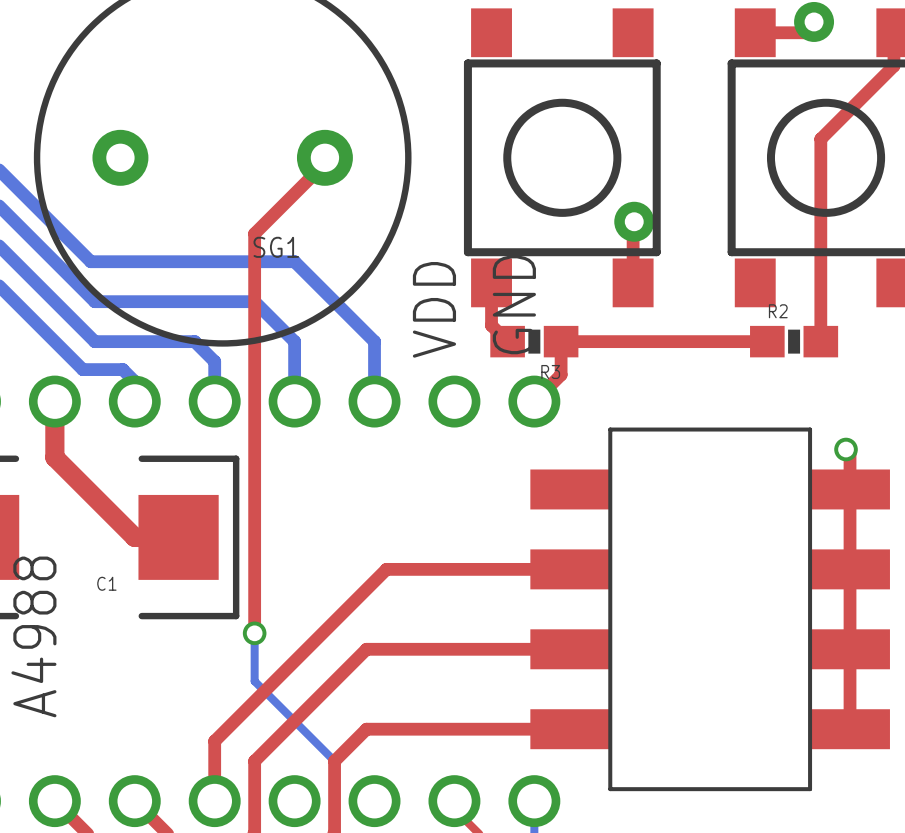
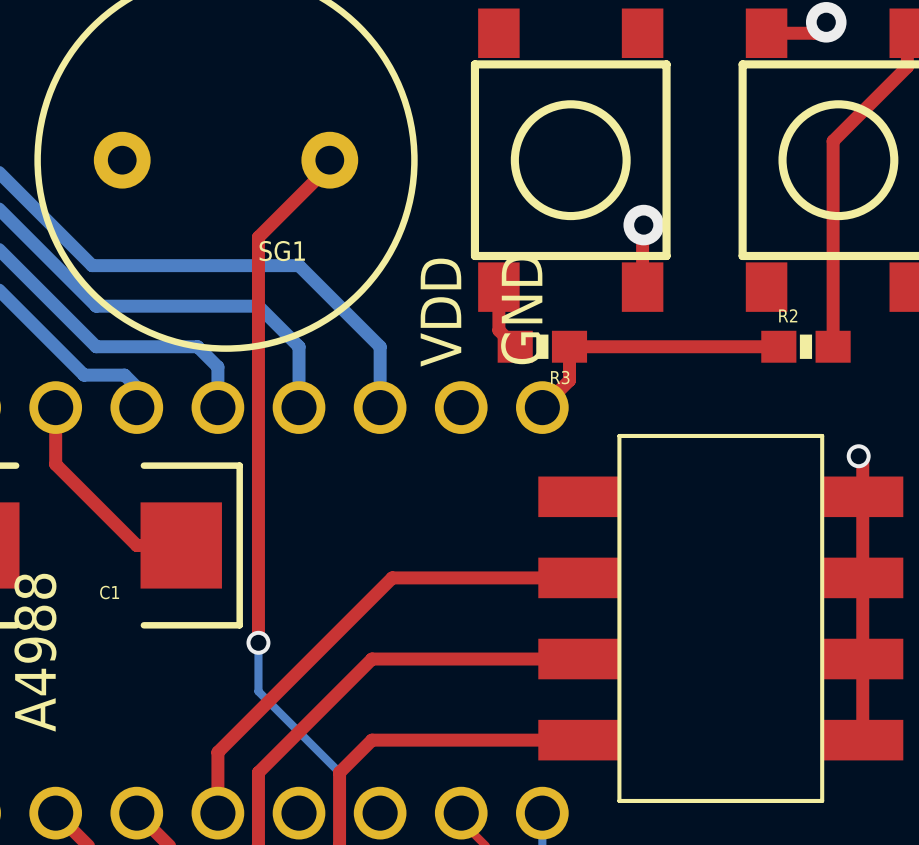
top track width: thick (54, 401) (54, 457) (134, 537) (178, 537) -> thin (55, 407) (55, 464) (136, 545) (181, 545)

